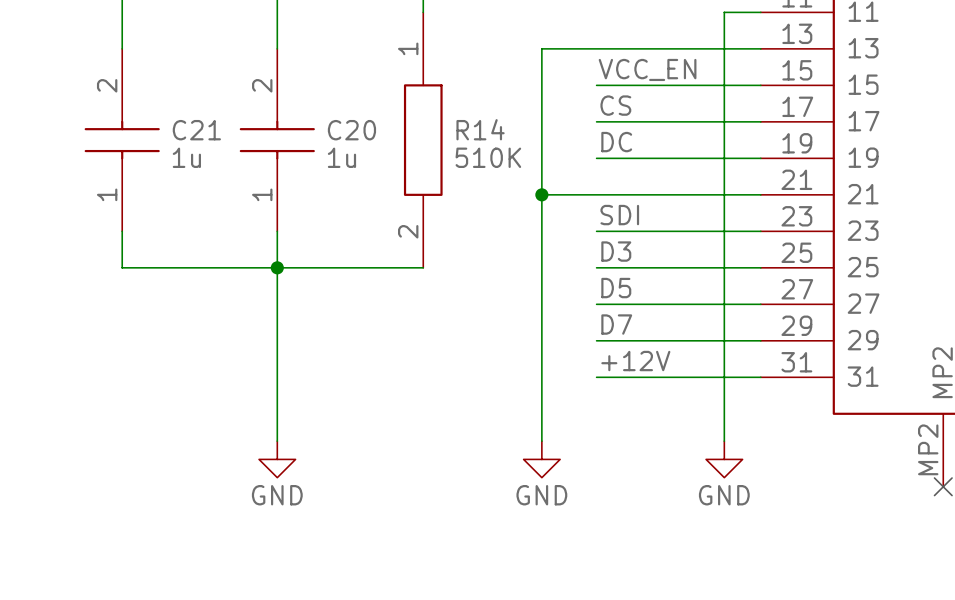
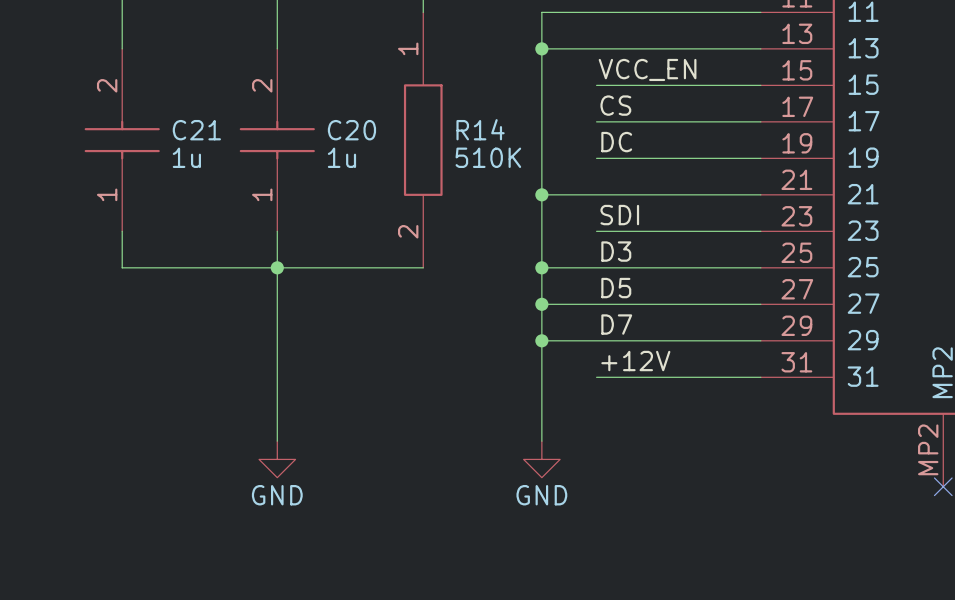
wire: (724, 12) (724, 441) -> (724, 12) (541, 12) (541, 48)
junction: none -> (541, 48)
wire: none -> (541, 267) (596, 267)
junction: none -> (541, 267)
wire: none -> (541, 304) (596, 304)
junction: none -> (541, 304)
wire: none -> (541, 340) (596, 340)
junction: none -> (541, 340)
power symbol: GND (724, 459) -> none

